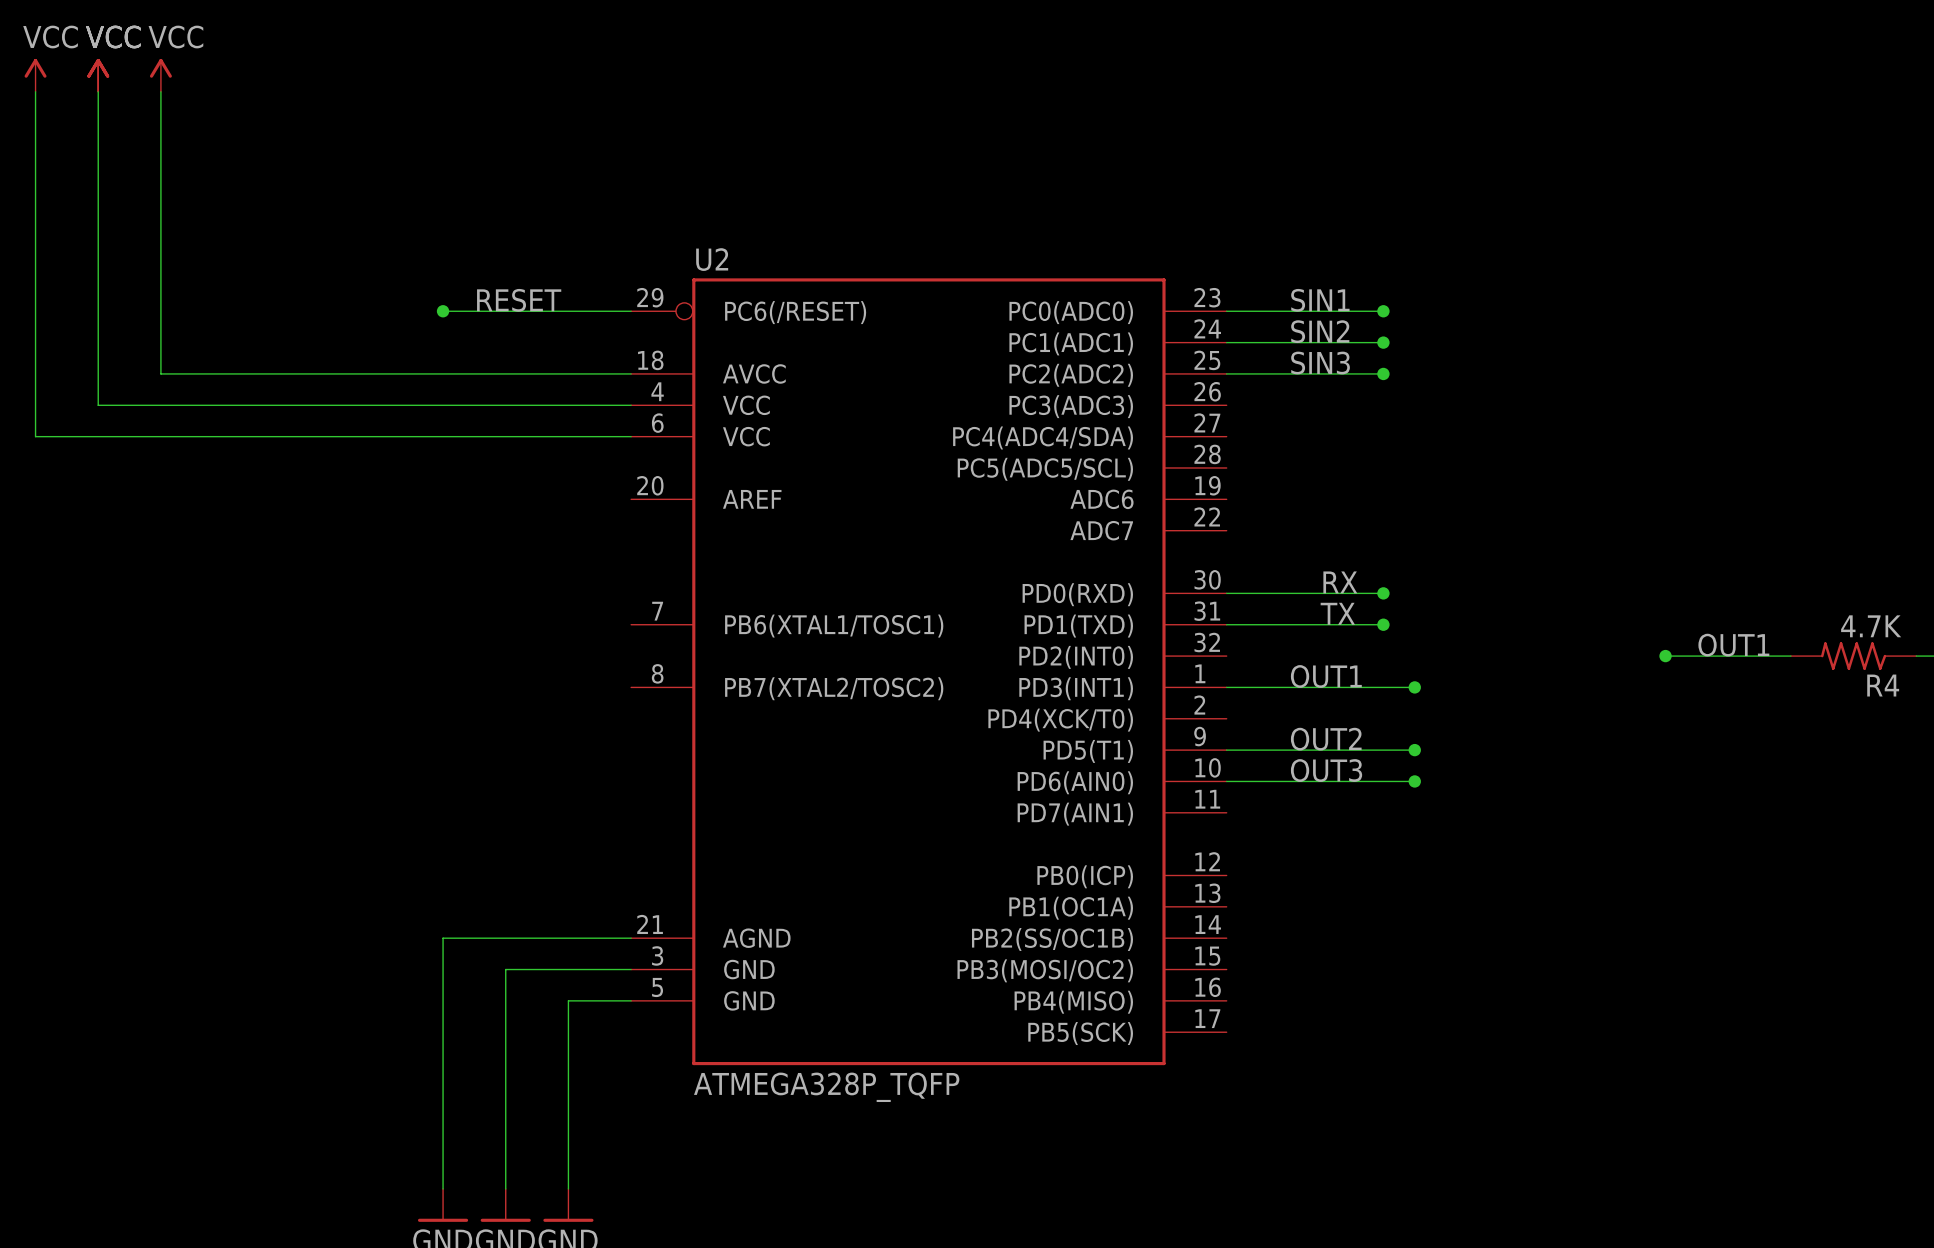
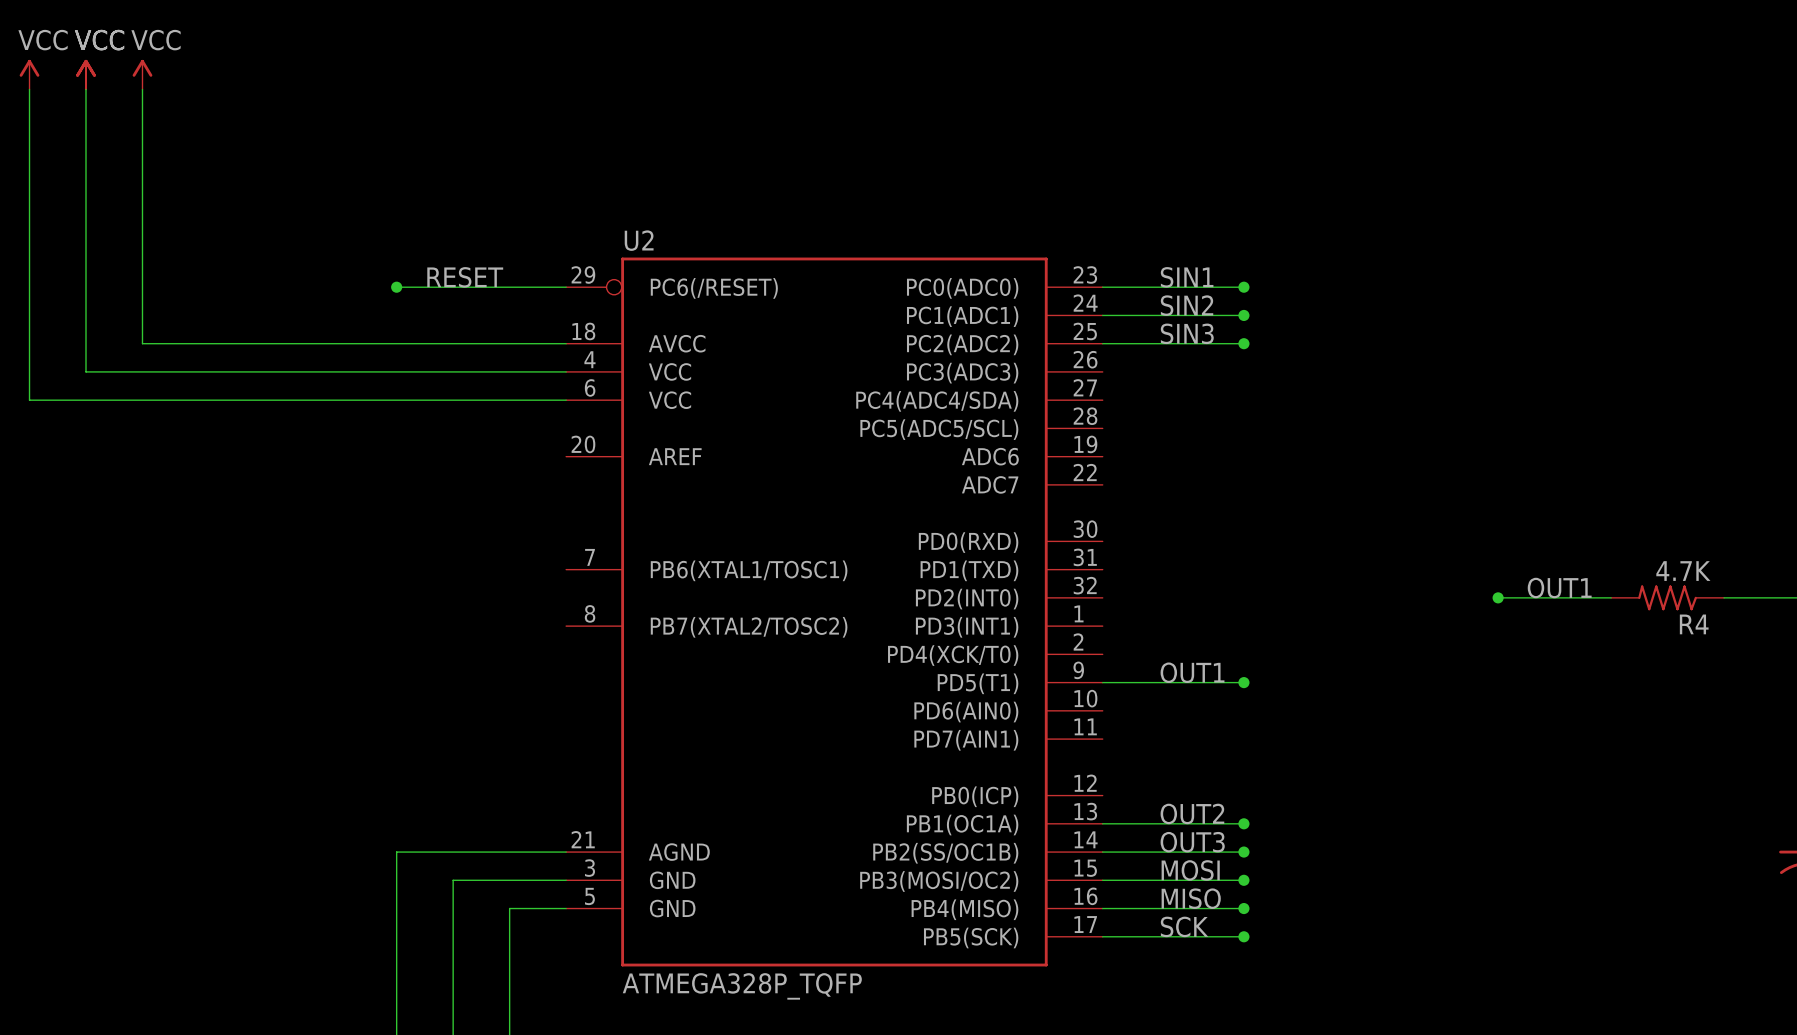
label: RX (1340, 582) -> none
wire: (1226, 593) (1383, 593) -> none
junction: (1383, 593) -> none
label: TX (1337, 613) -> none
wire: (1226, 624) (1383, 624) -> (1102, 823) (1243, 823)
junction: (1383, 624) -> none
label: OUT1 (1326, 676) -> none
wire: (1226, 687) (1414, 687) -> none
junction: (1414, 687) -> none
label: OUT2 (1326, 739) -> OUT1 (1192, 672)
wire: (1383, 750) (1414, 750) -> none
junction: none -> (1243, 682)
junction: (1414, 750) -> none
label position: OUT3 (1326, 770) -> OUT3 (1192, 842)
wire: (1226, 781) (1414, 781) -> none
junction: (1414, 781) -> none
label: none -> OUT2 (1192, 813)
junction: none -> (1243, 823)
wire: none -> (1102, 852) (1243, 852)
junction: none -> (1243, 852)
label: none -> MOSI (1190, 870)
wire: none -> (1102, 880) (1243, 880)
junction: none -> (1243, 880)
label: none -> MISO (1191, 898)
wire: none -> (1102, 908) (1243, 908)
junction: none -> (1243, 908)
label: none -> SCK (1184, 926)
wire: none -> (1102, 936) (1243, 936)
junction: none -> (1243, 936)

